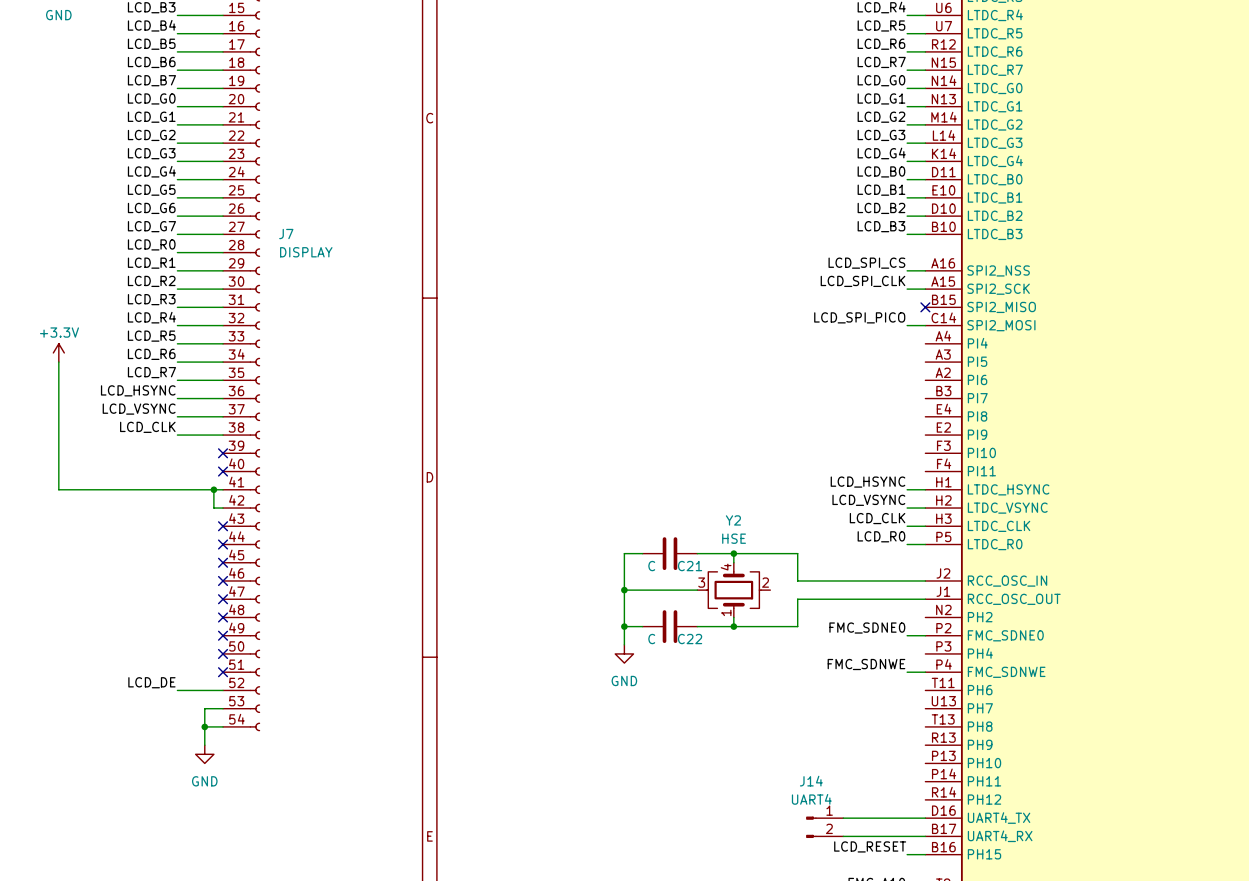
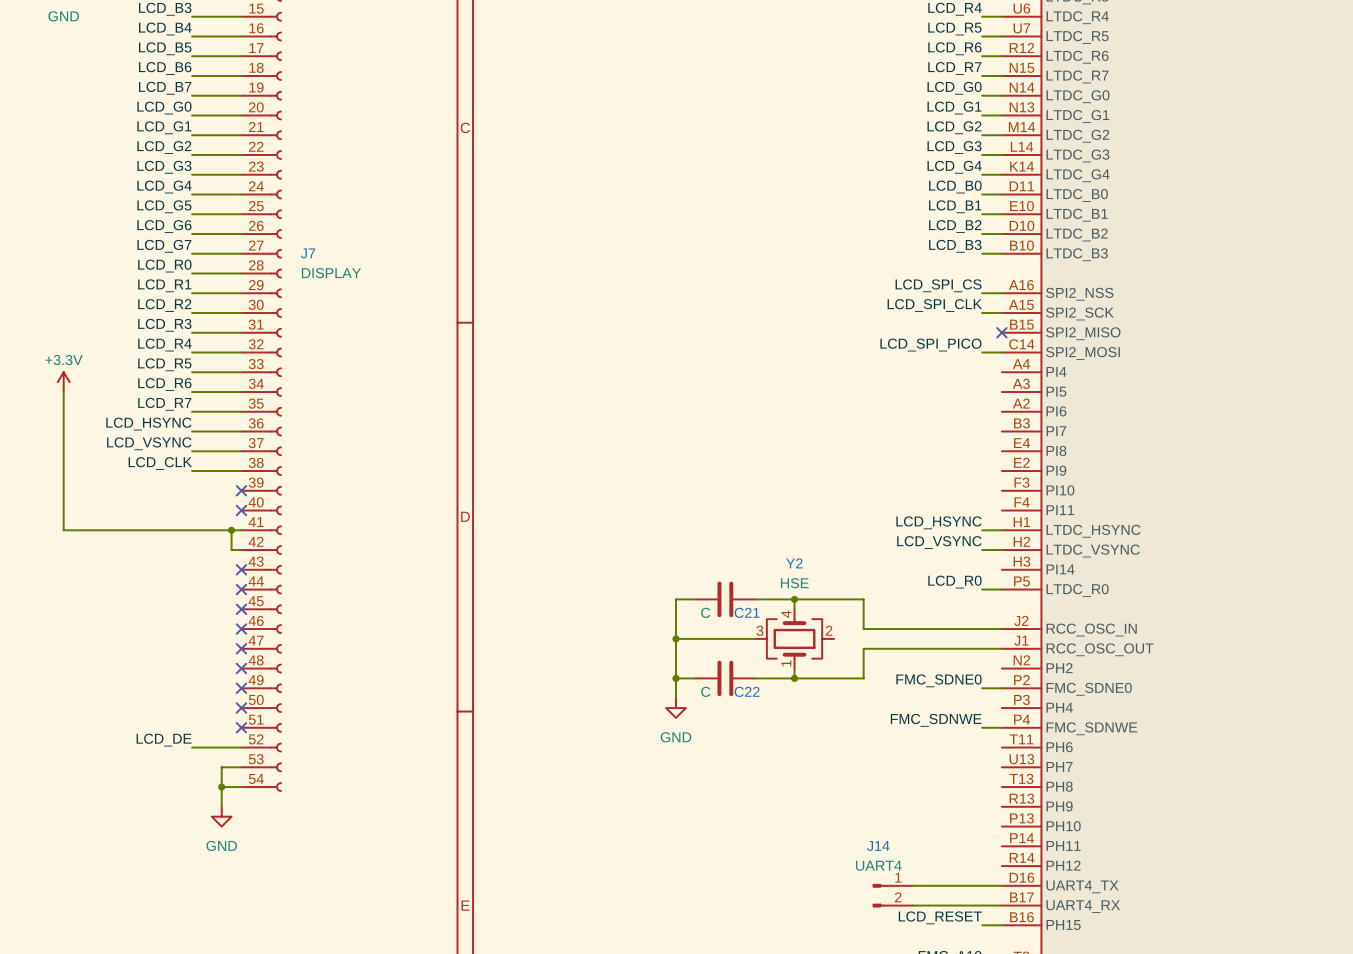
label: LCD_CLK (877, 518) -> none
wire: (907, 526) (925, 526) -> none
part pin name: LTDC_CLK (999, 526) -> PI14 (1060, 569)

